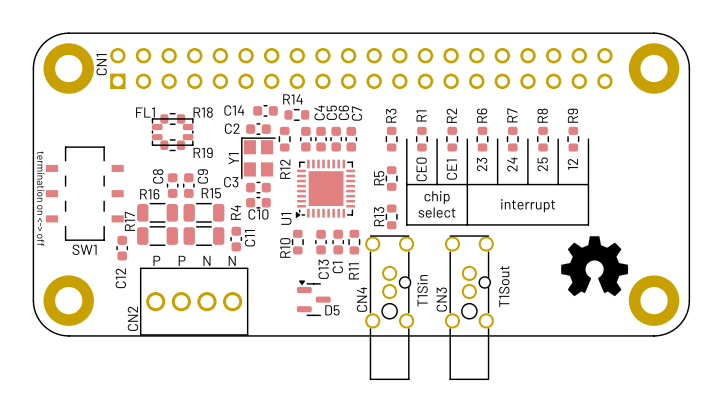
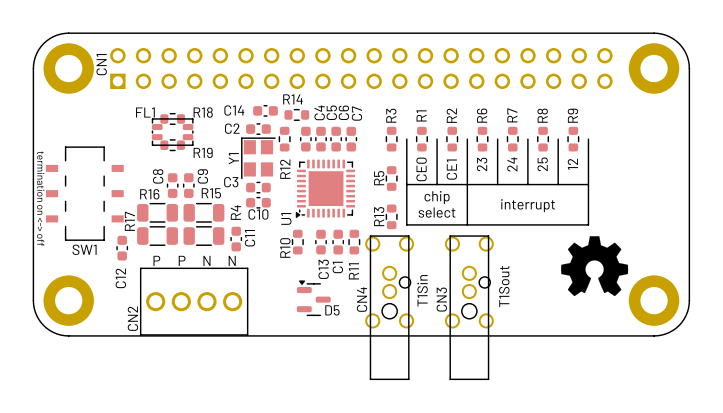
CN4 footprint: [365, 235, 415, 380] -> [365, 235, 415, 380]
CN3 footprint: [444, 235, 494, 380] -> [444, 235, 494, 380]

